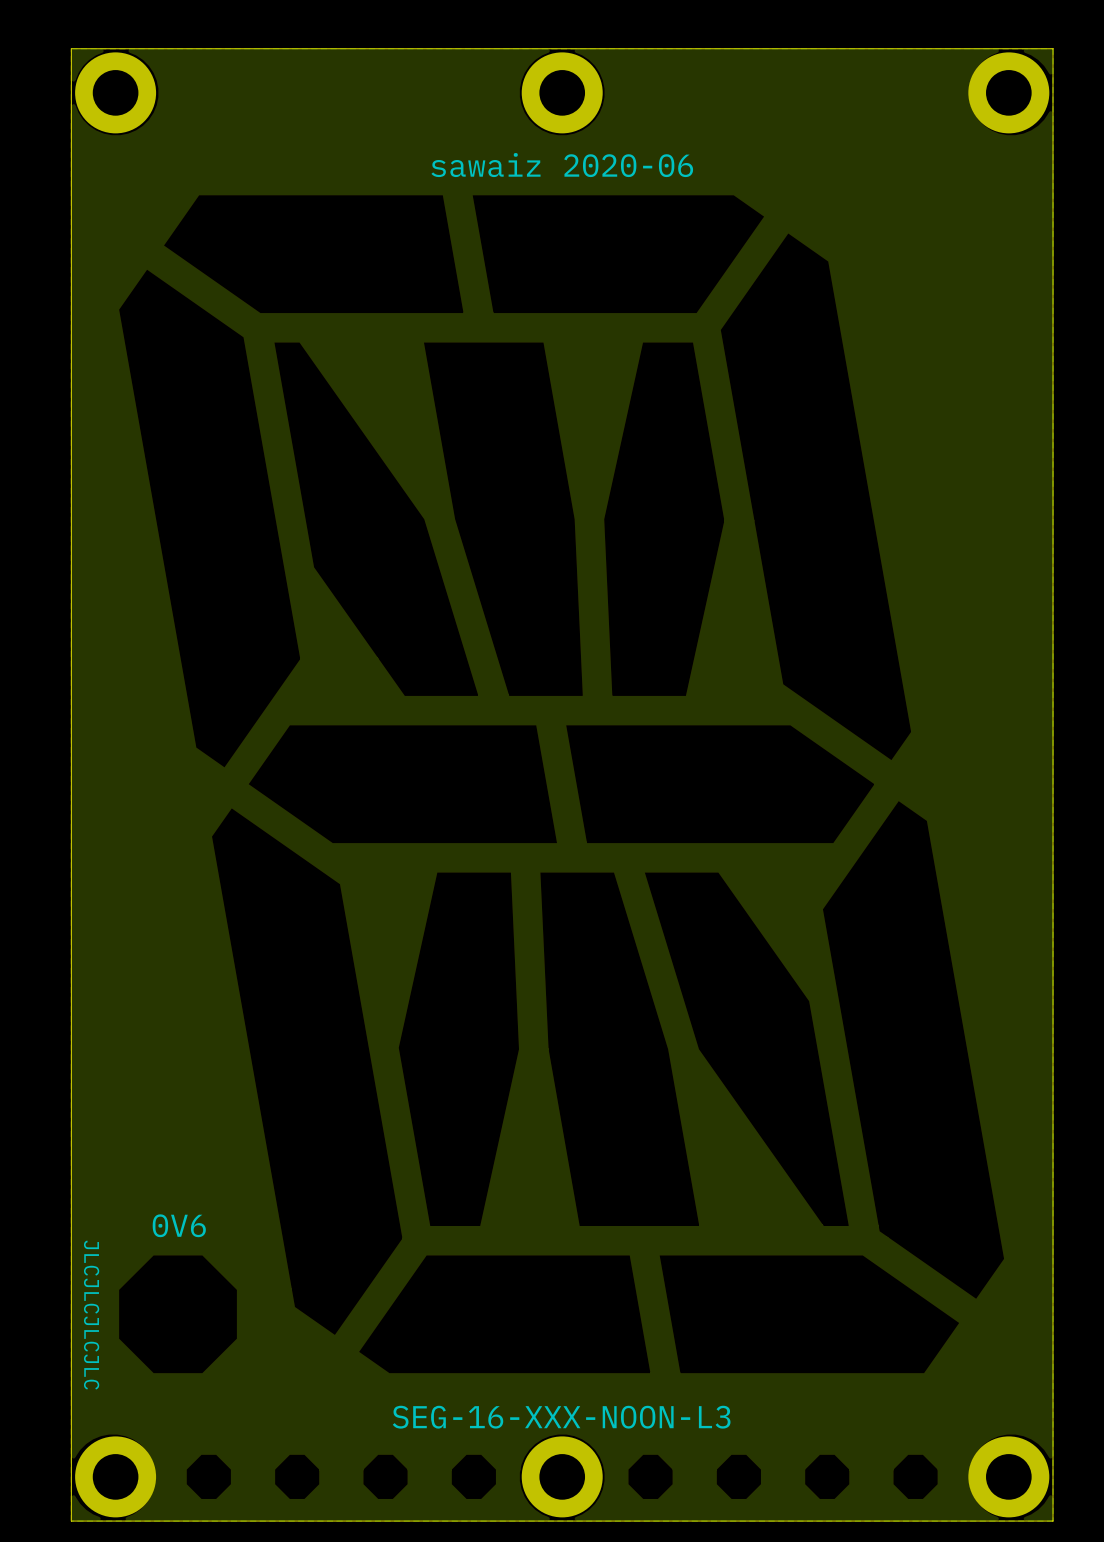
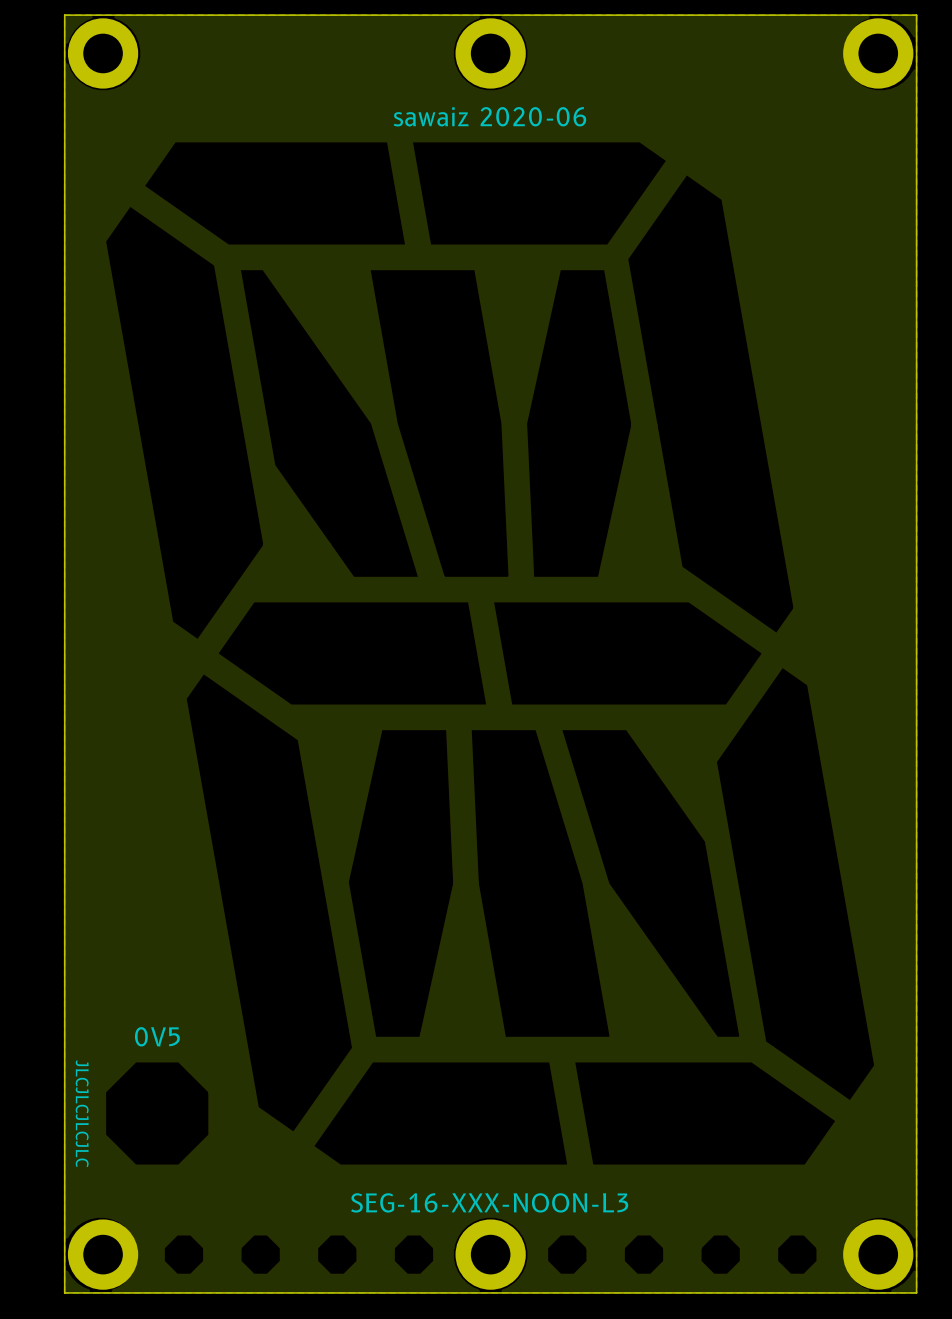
text: 0V6 (179, 1225) -> 0V5 (157, 1036)

